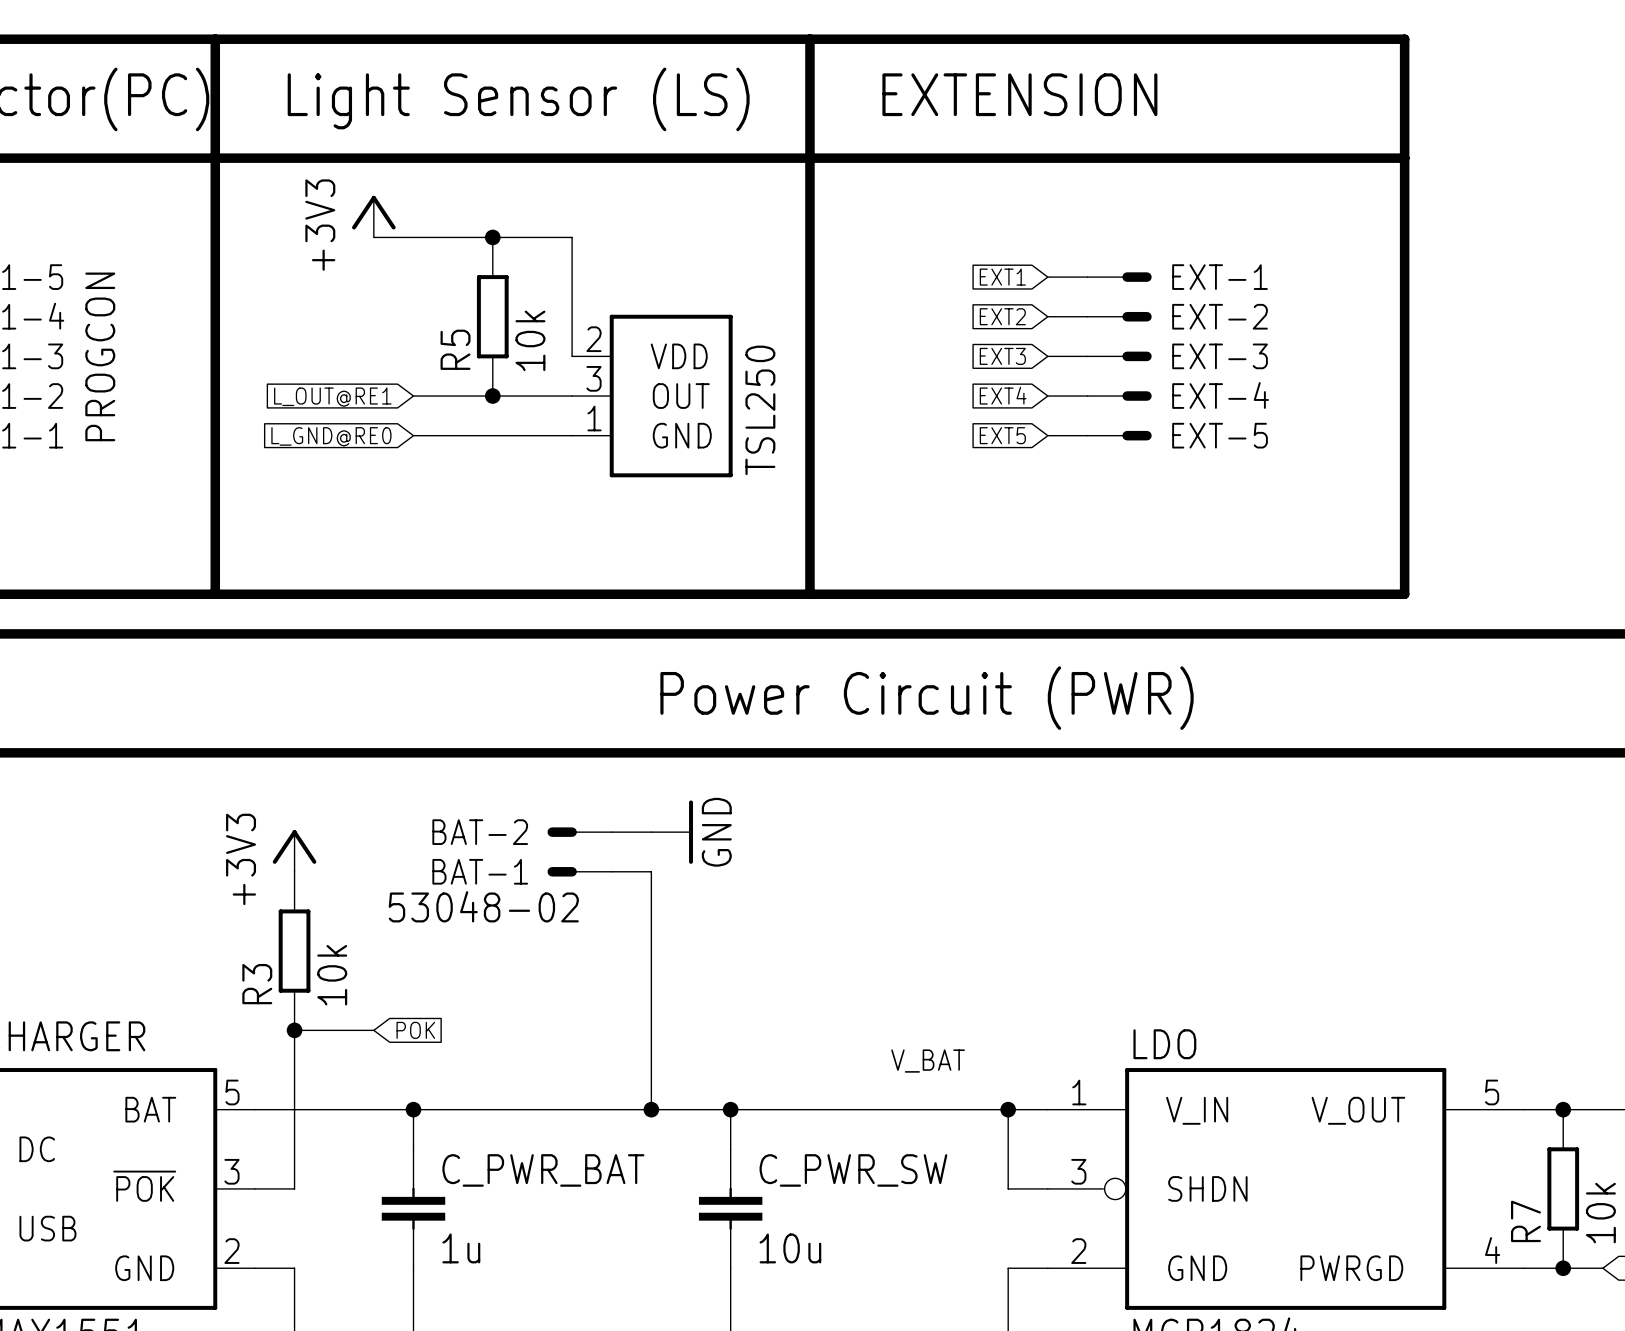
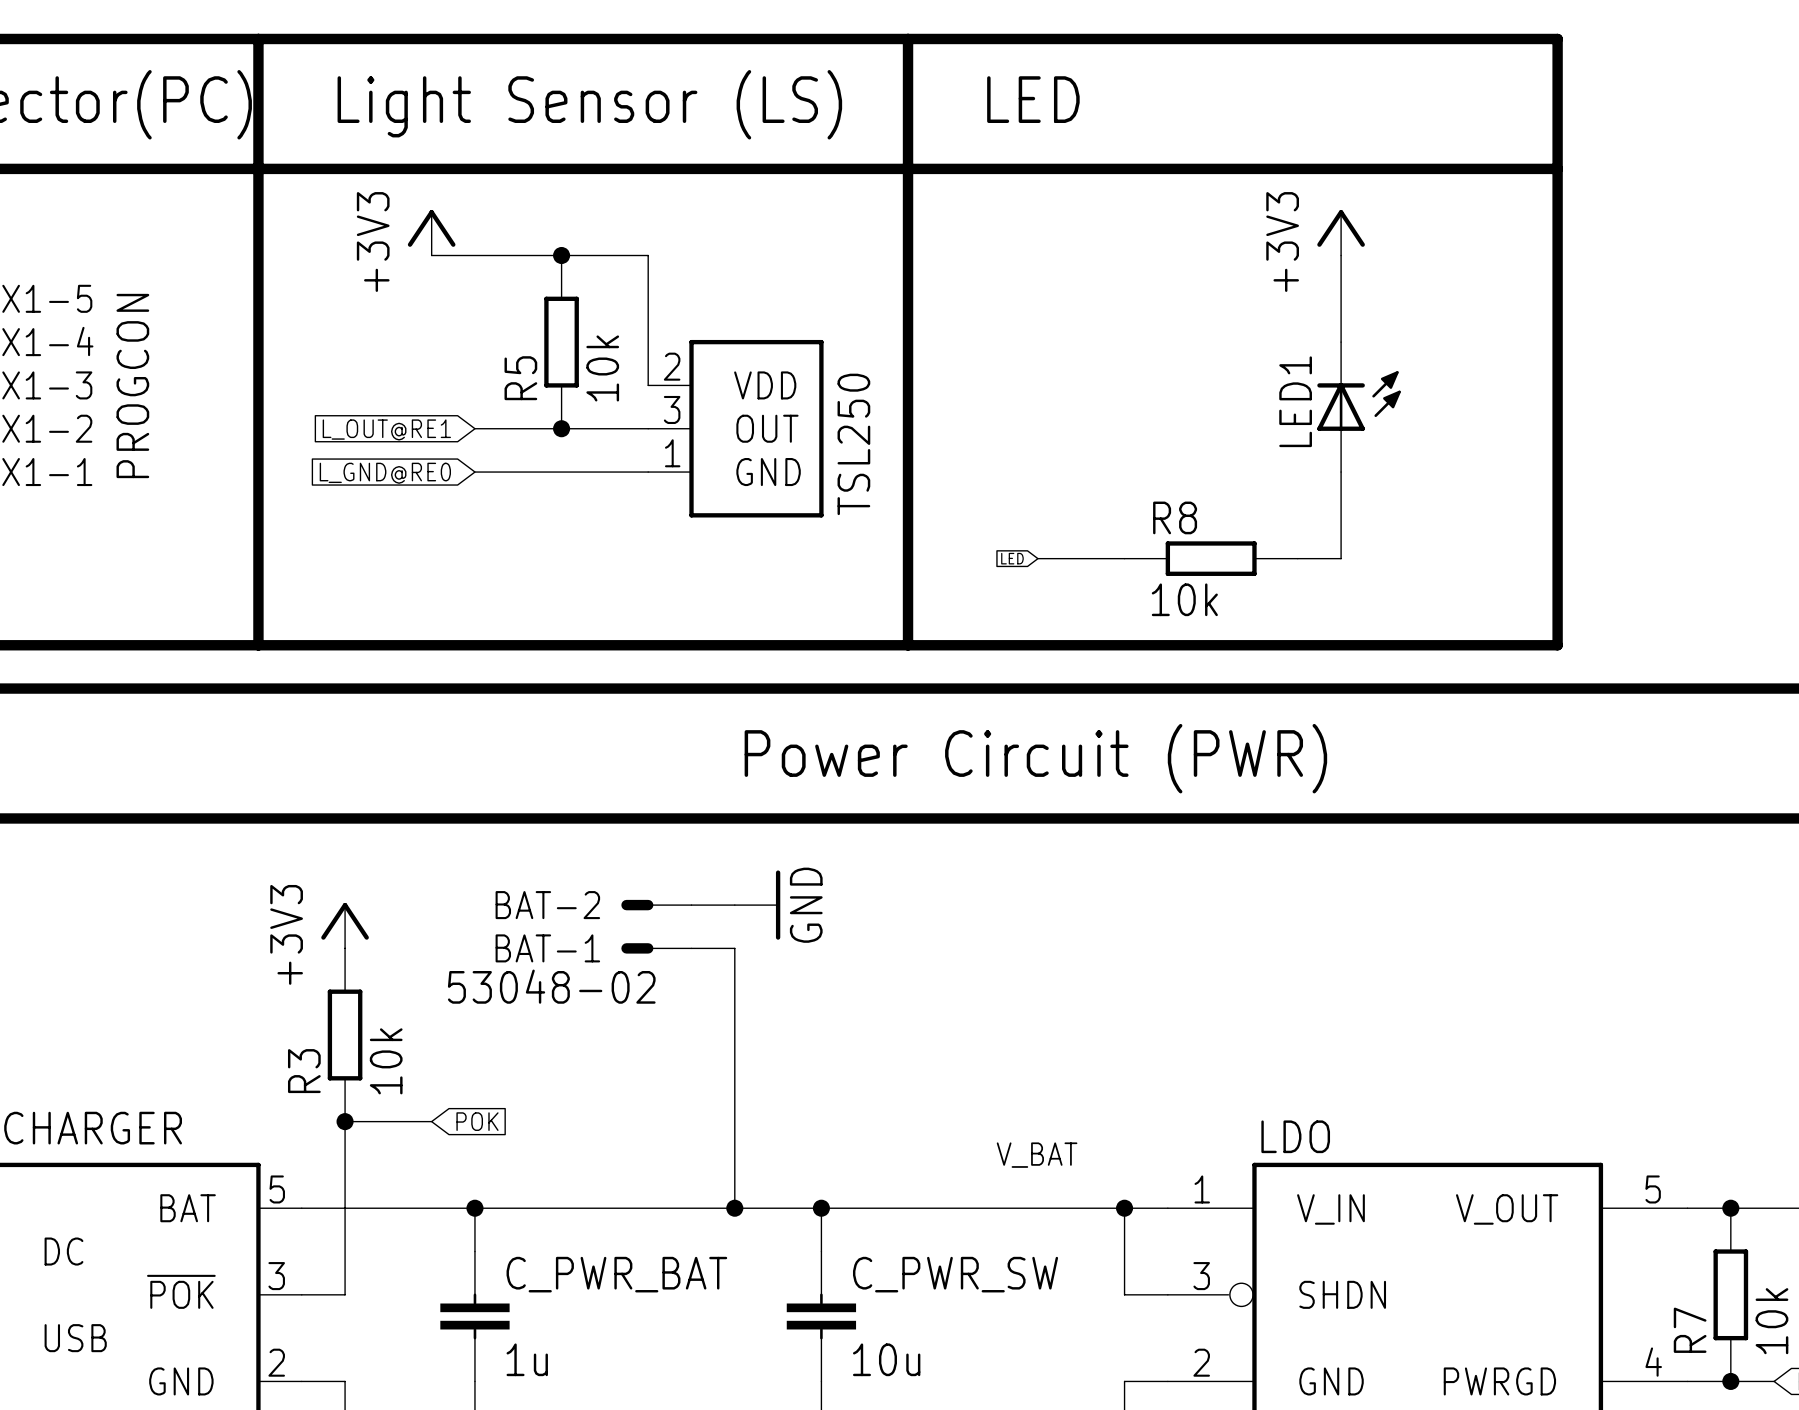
text: EXTENSION (1019, 94) -> LED (1033, 99)
power symbol: none -> +3V3 (1341, 232)
wire: none -> (1341, 255) (1341, 342)
global label: EXT1 (1002, 277) -> none
wire: (1047, 277) (1087, 277) -> none
EXT-1: (1119, 277) -> none
global label: EXT2 (1002, 316) -> none
wire: (1047, 316) (1087, 316) -> none
EXT-2: (1119, 316) -> none
global label: EXT3 (1002, 356) -> none
wire: (1047, 356) (1087, 356) -> none
EXT-3: (1119, 356) -> none
LED1: none -> (1359, 407)
global label: EXT4 (1003, 395) -> none
wire: (1047, 396) (1087, 396) -> none
EXT-4: (1119, 396) -> none
global label: EXT5 (1002, 435) -> none
wire: (1047, 435) (1087, 435) -> none
EXT-5: (1119, 435) -> none
wire: none -> (1341, 472) (1341, 558) (1297, 558)
global label: none -> LED (1012, 558)
wire: none -> (1037, 558) (1124, 558)
R8: none -> 10k (1211, 558)

